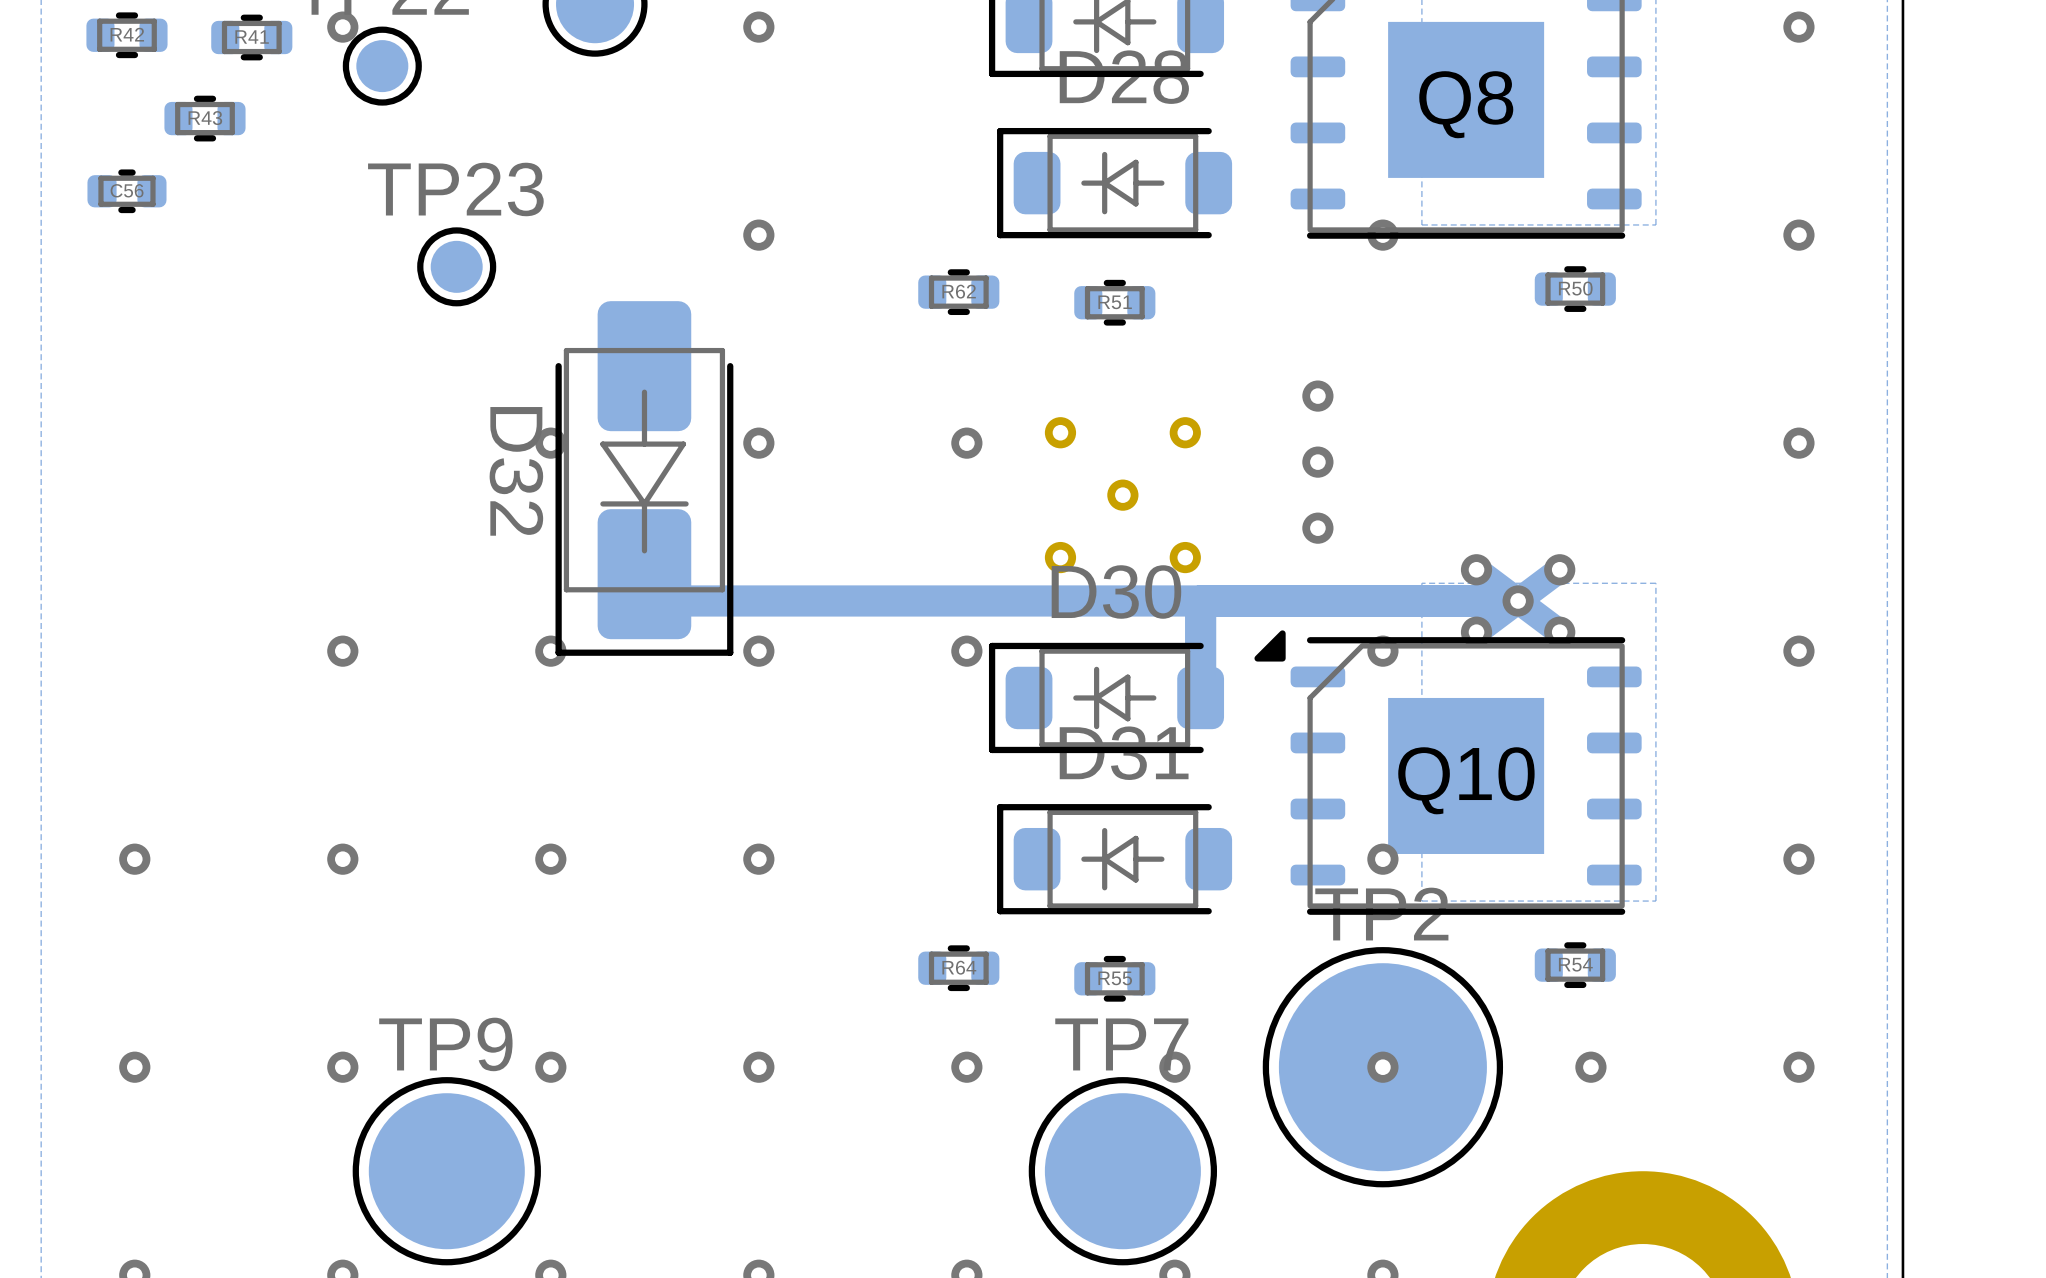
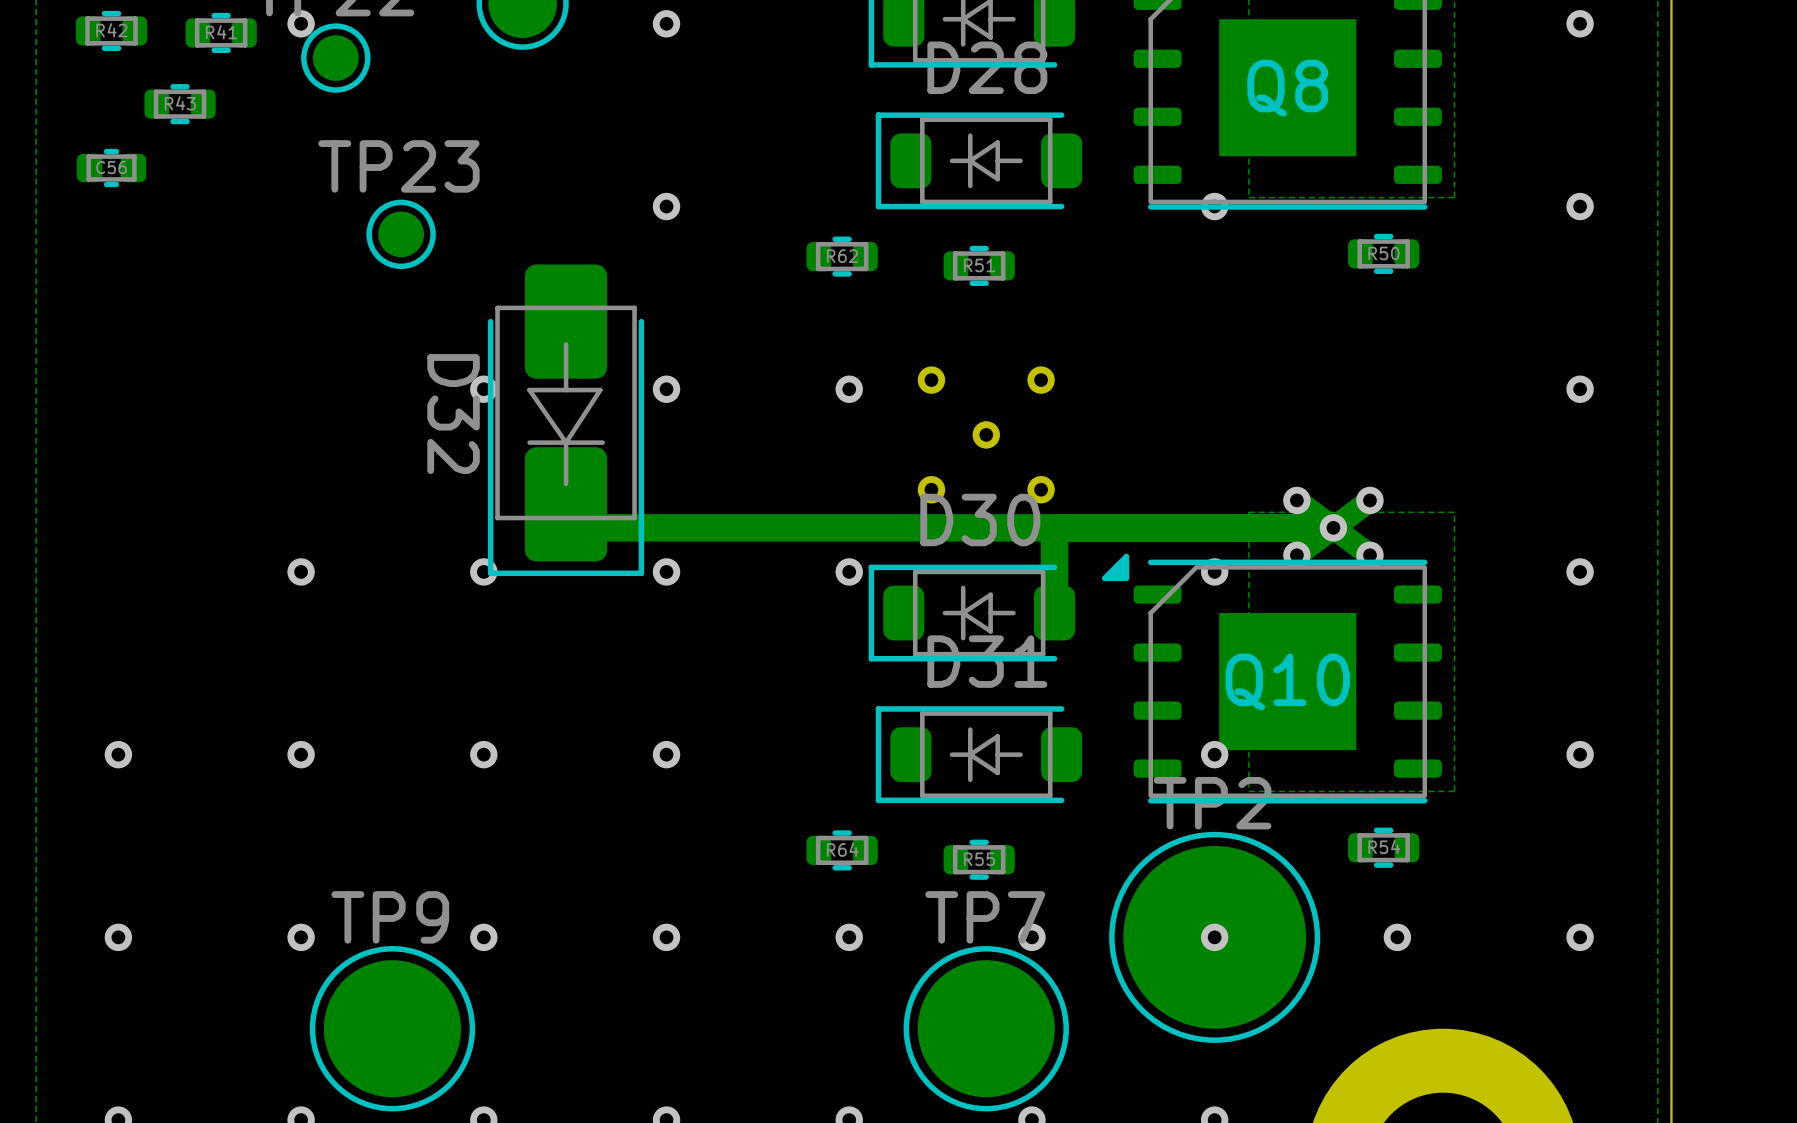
via: (1317, 396) -> none
via: (1317, 462) -> none
via: (1317, 528) -> none

